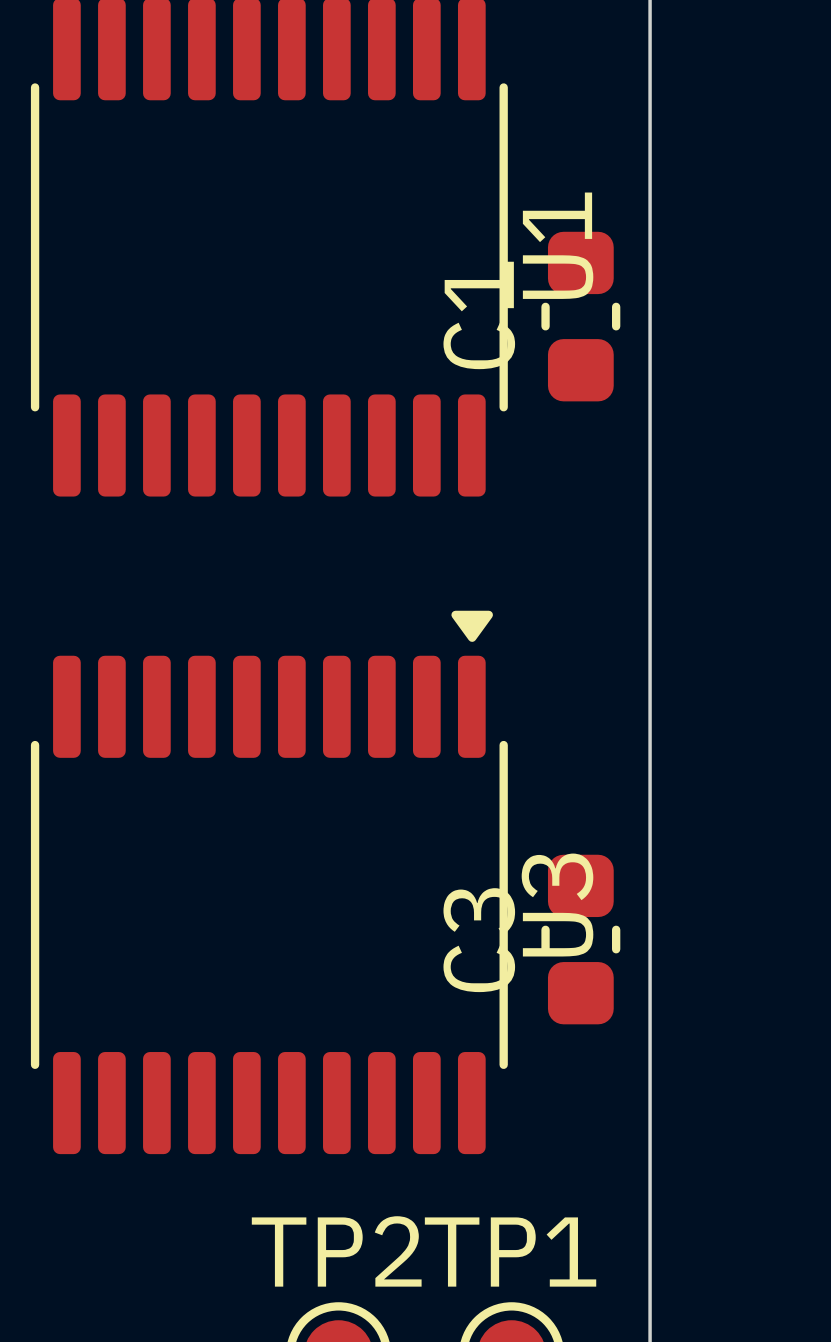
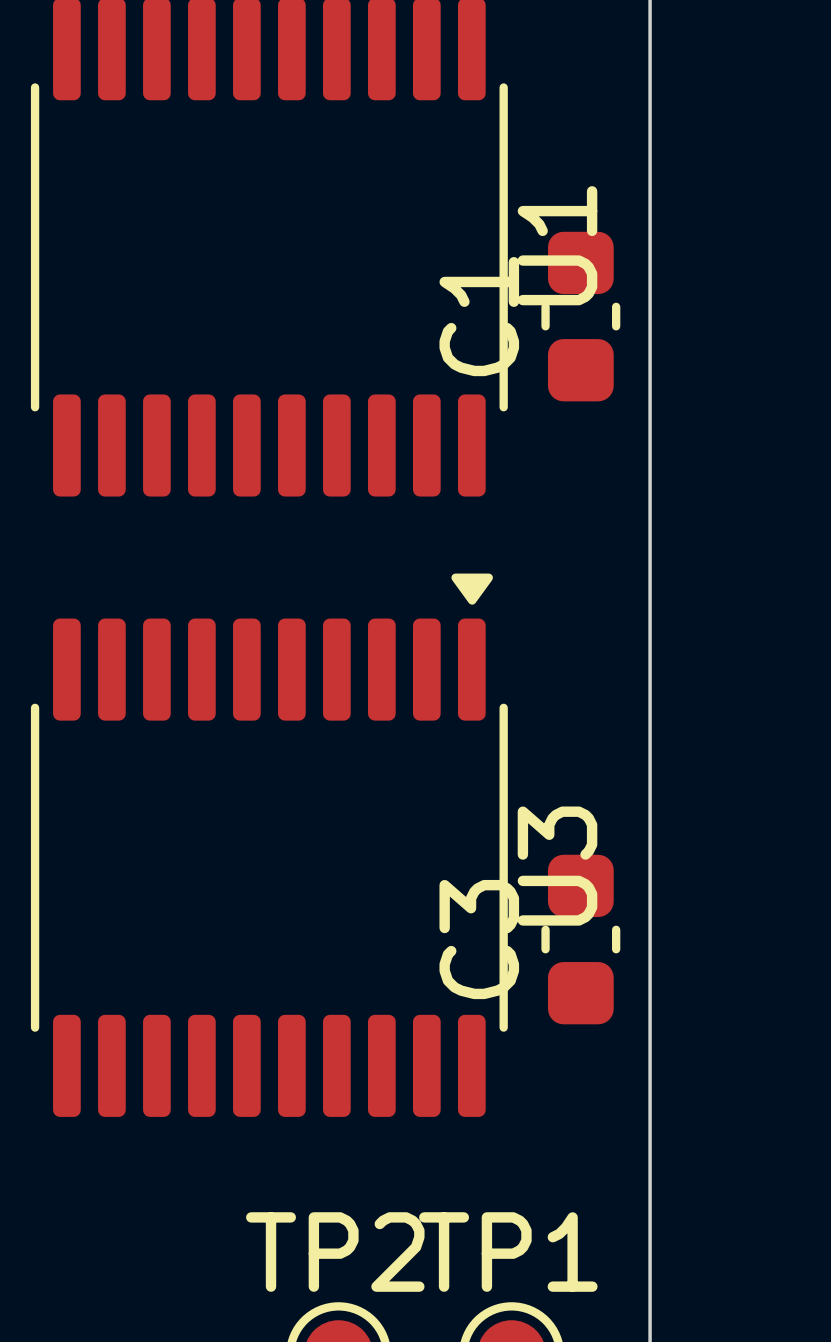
U3 position: (269, 882) -> (269, 845)

